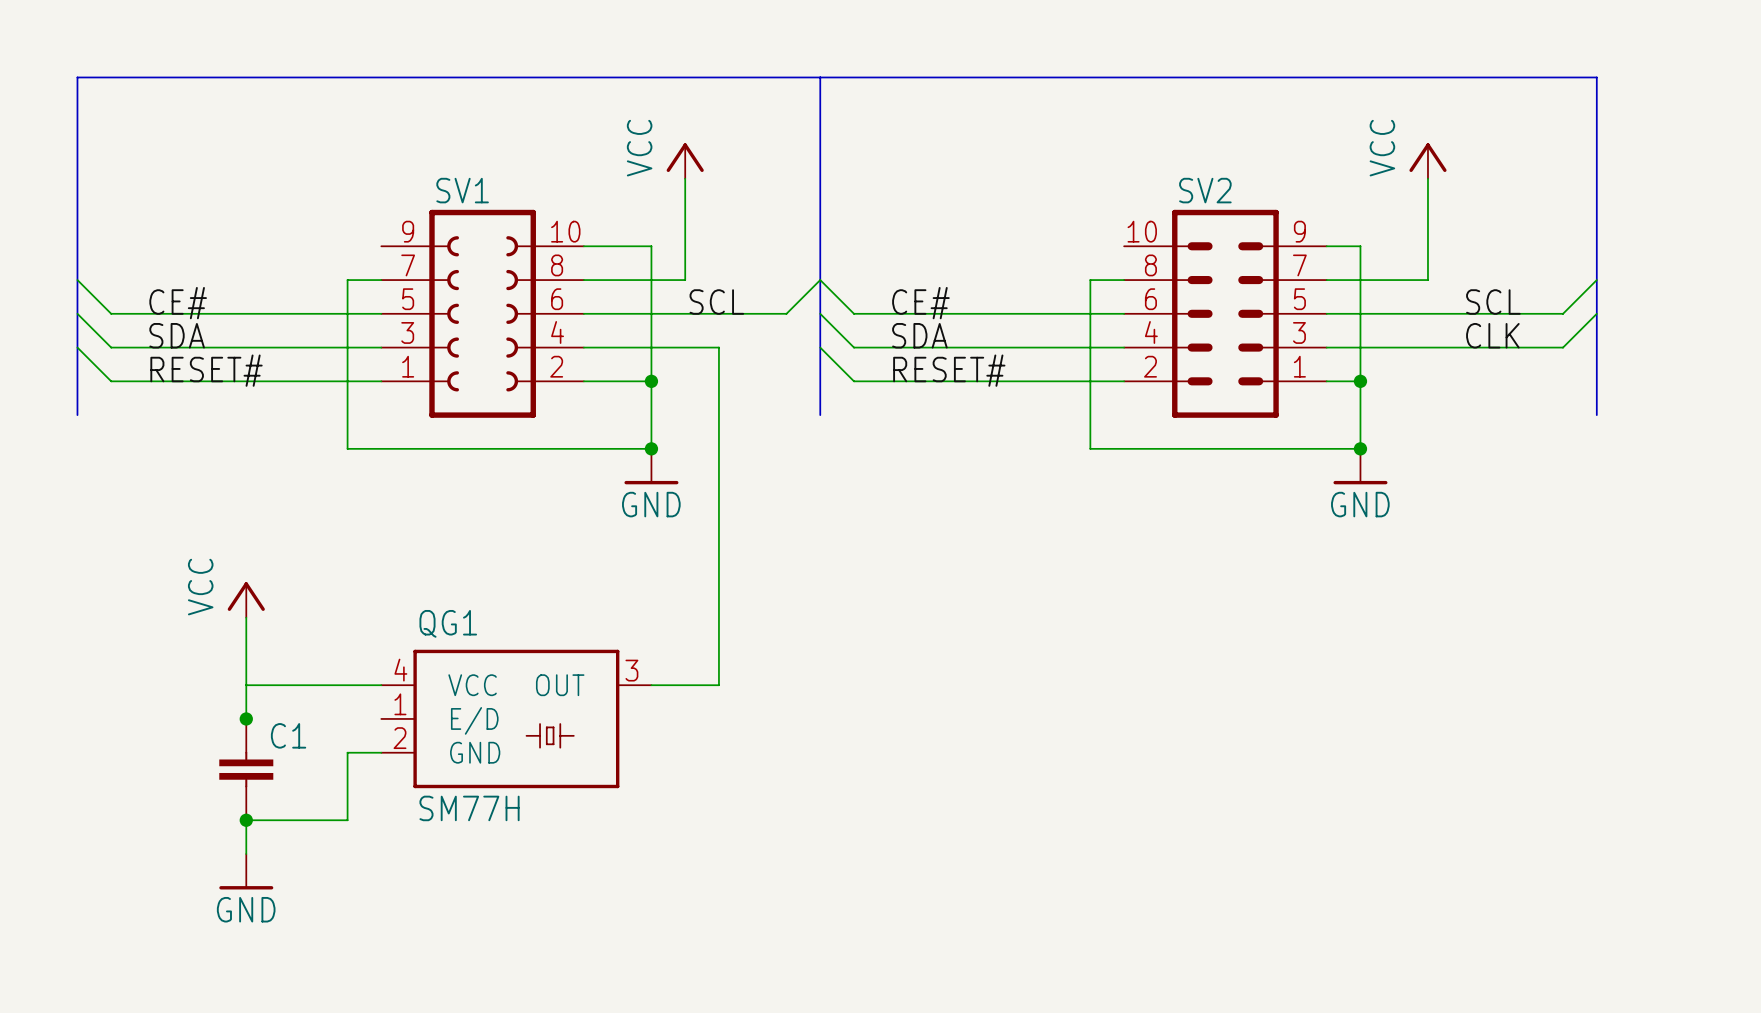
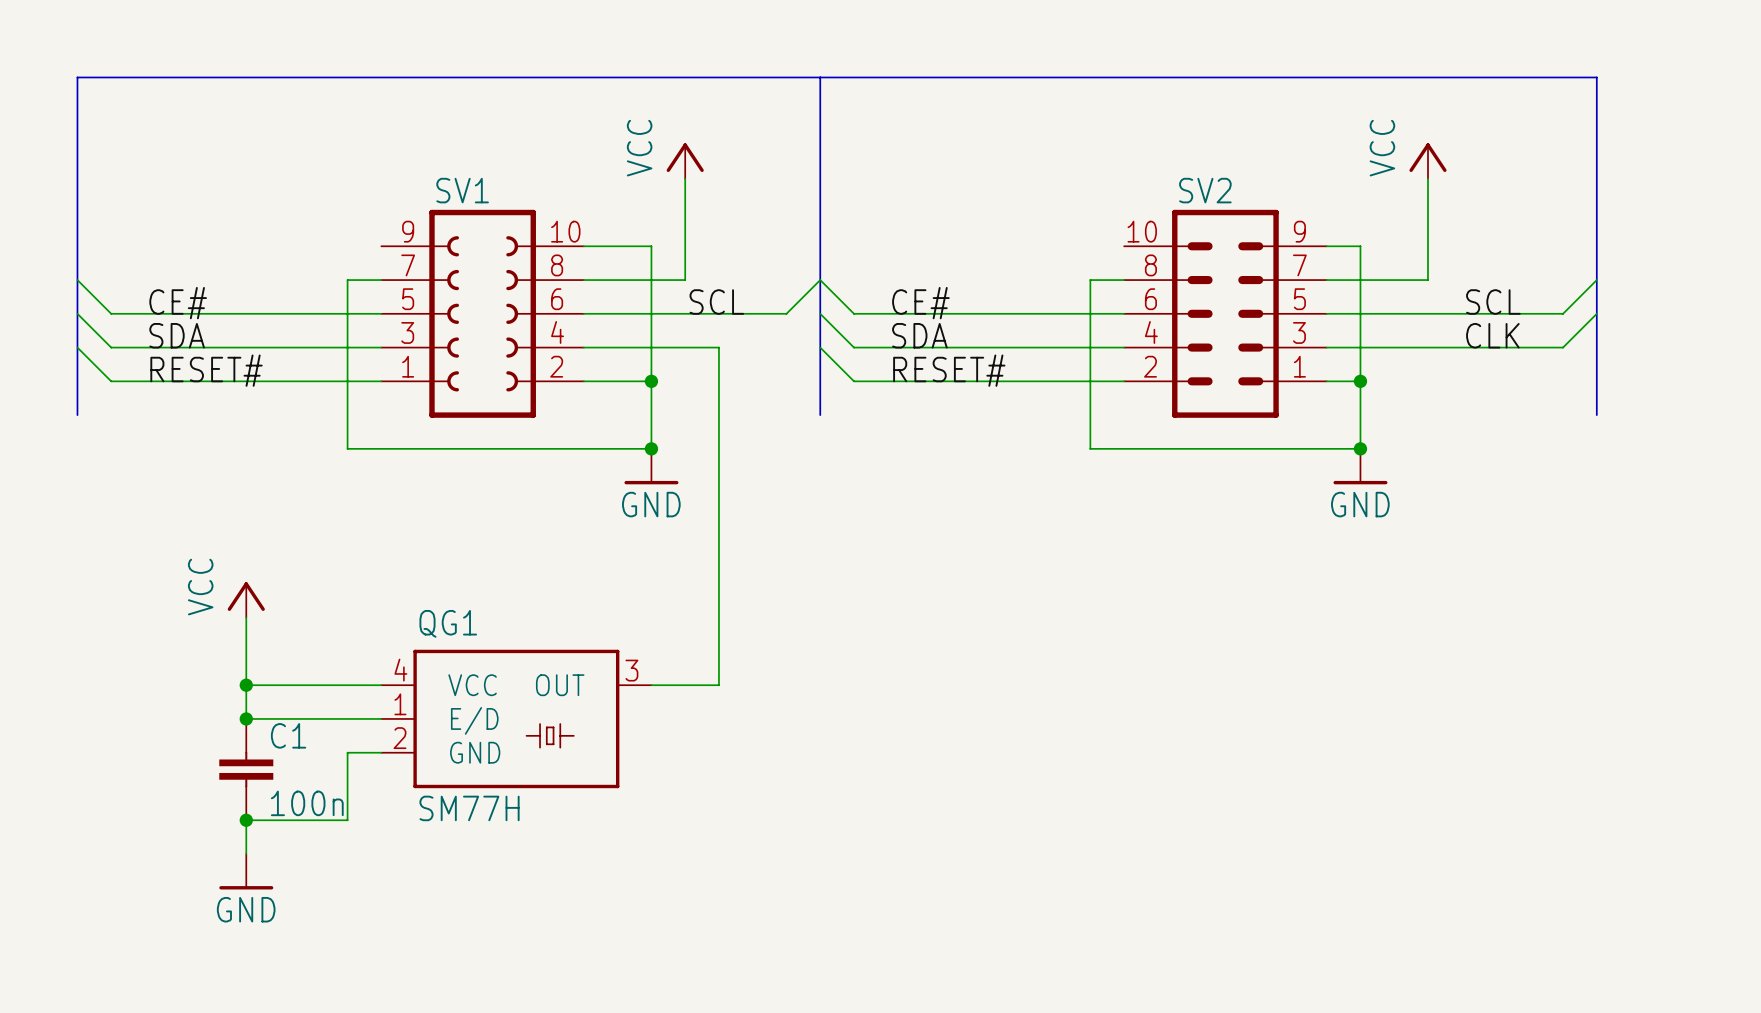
junction: none -> (246, 685)
wire: none -> (246, 718) (381, 718)
C1 value: none -> 100n (307, 803)

